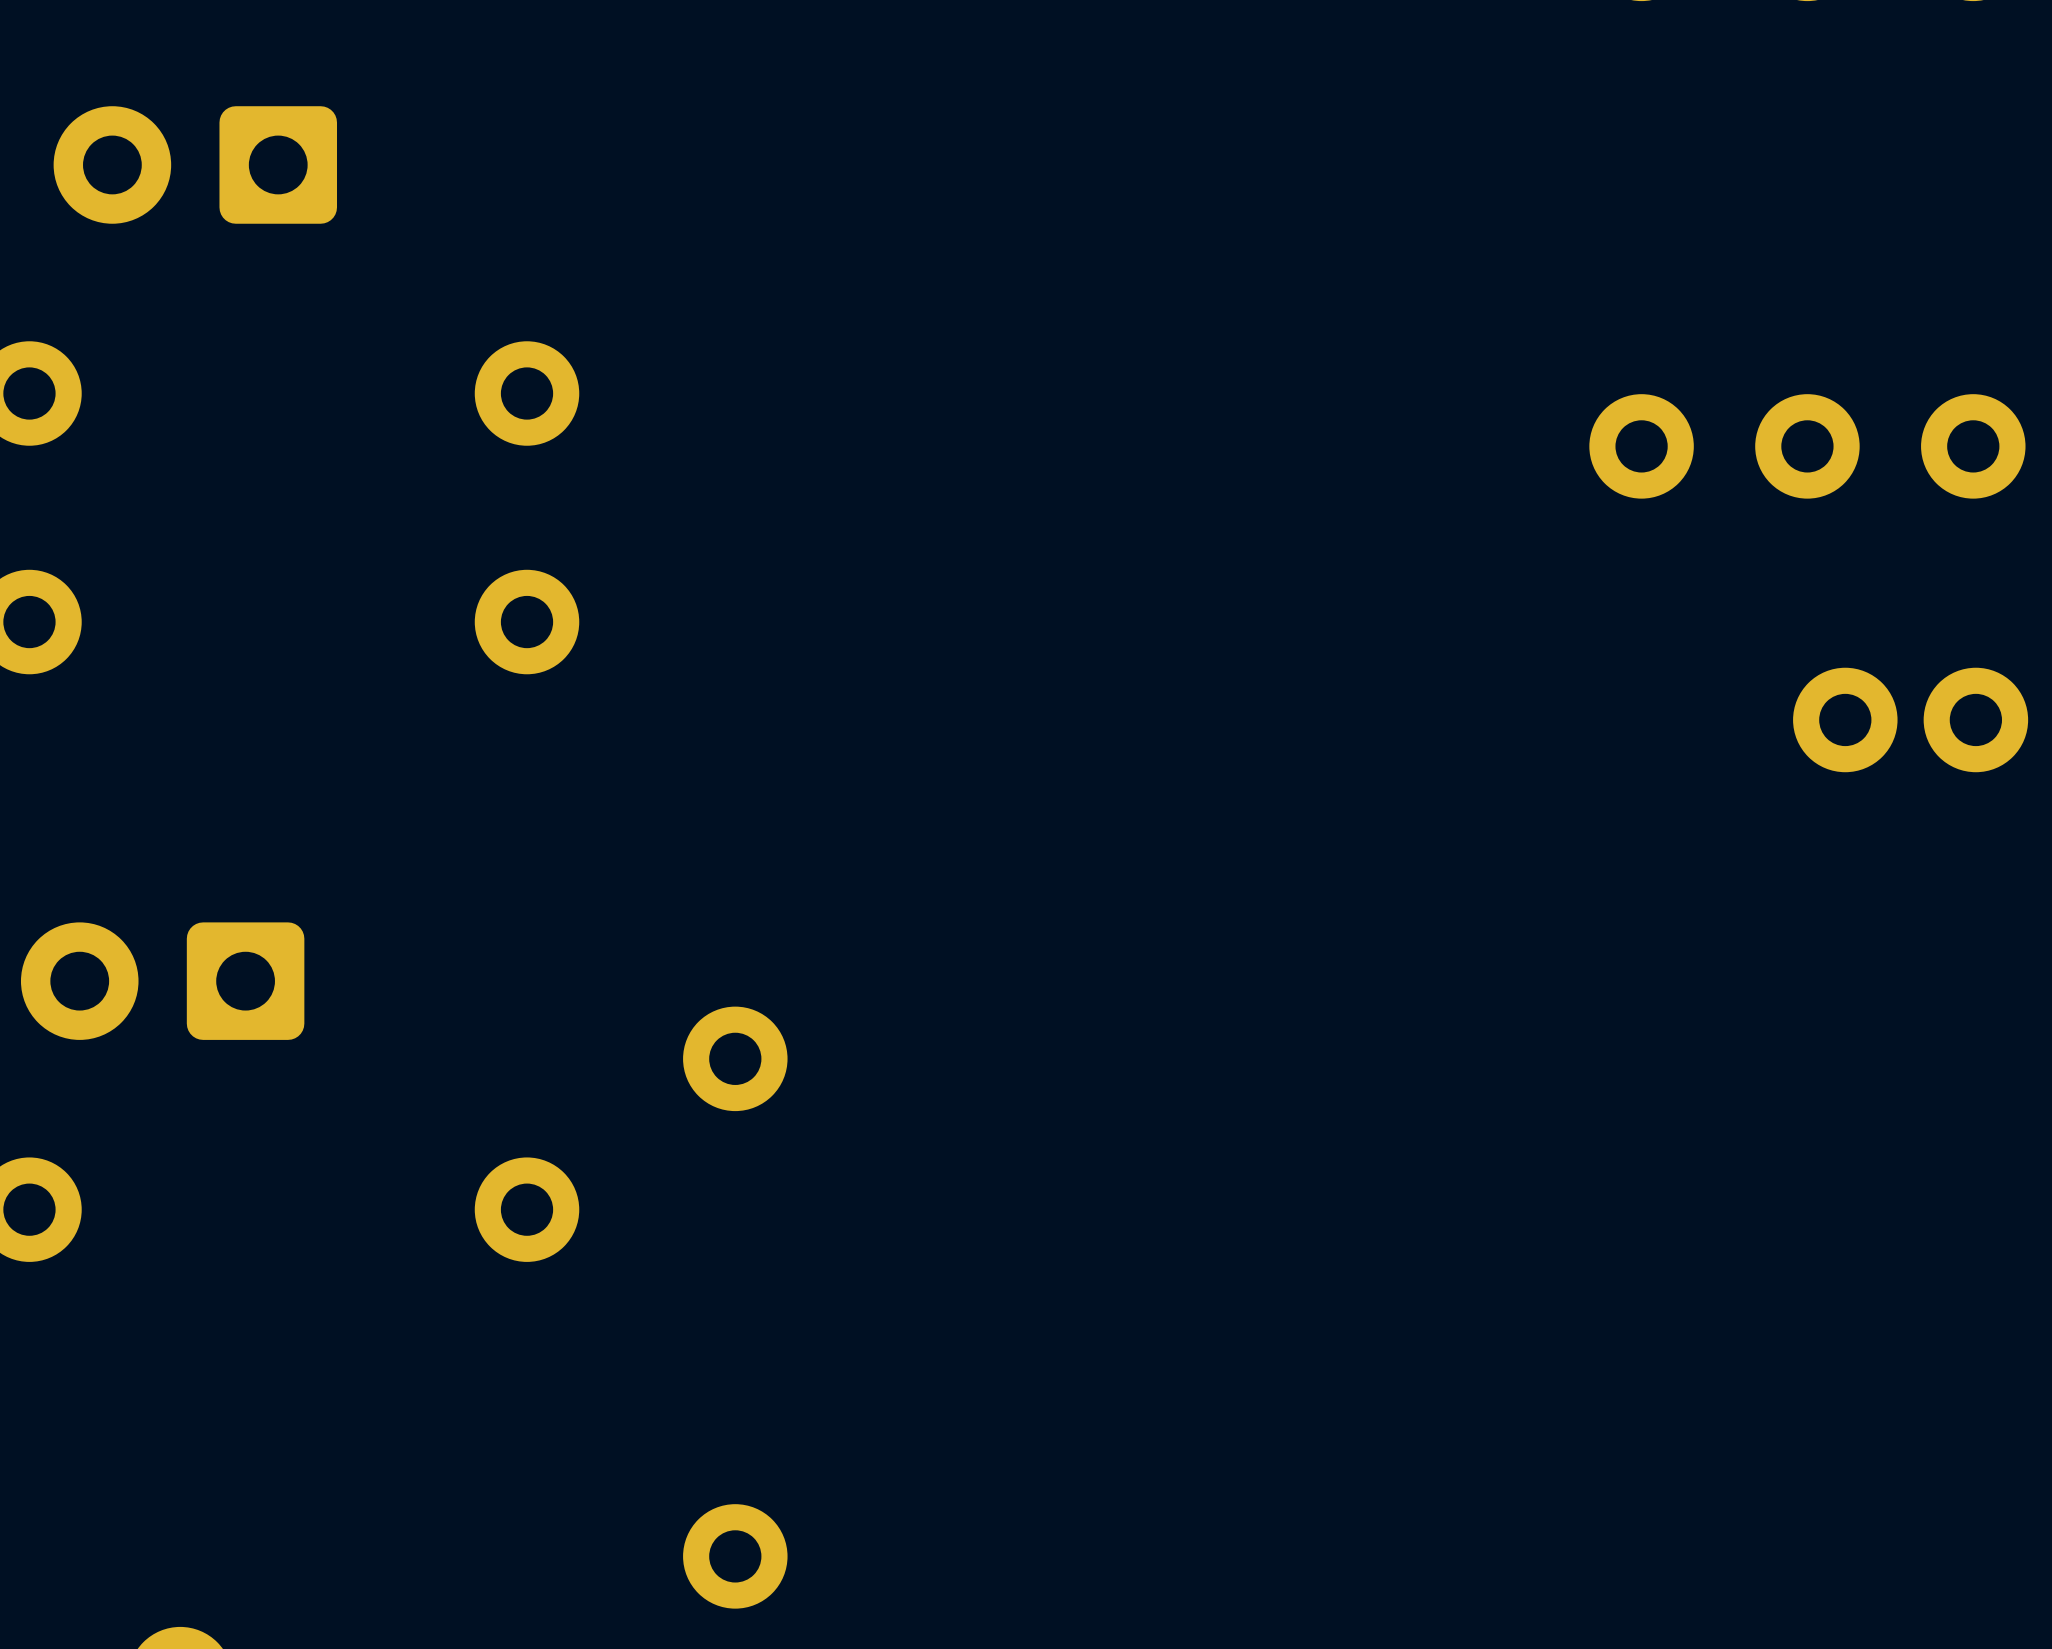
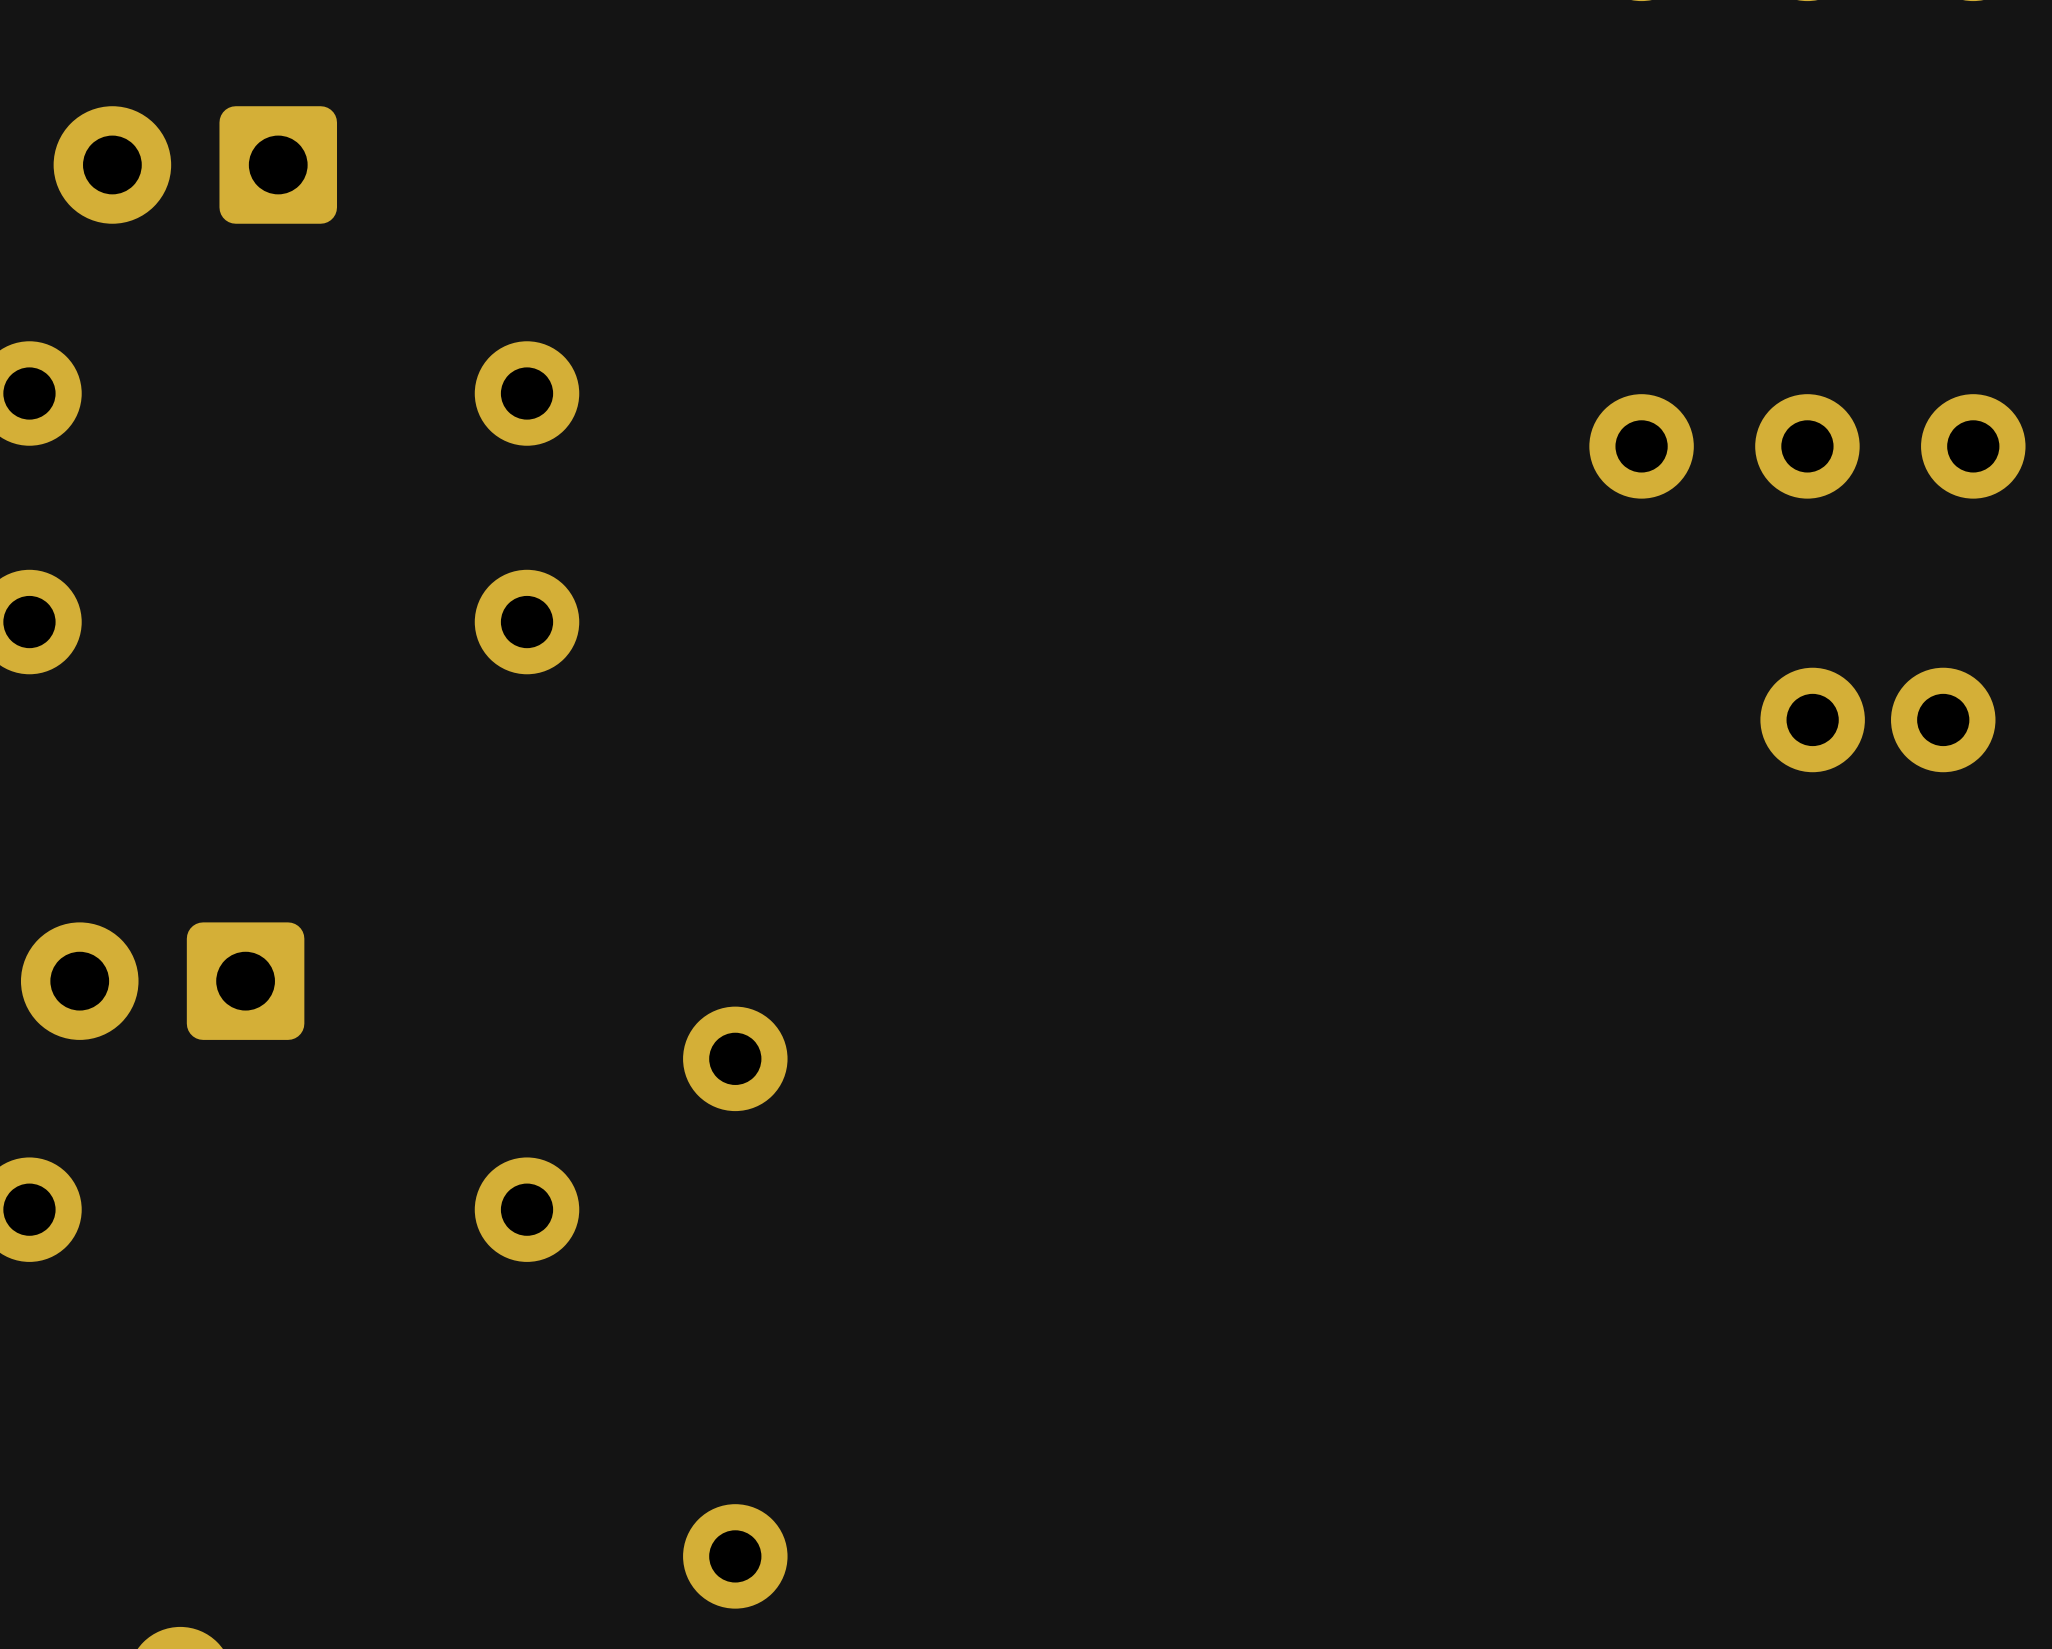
part position: (1910, 719) -> (1877, 719)

